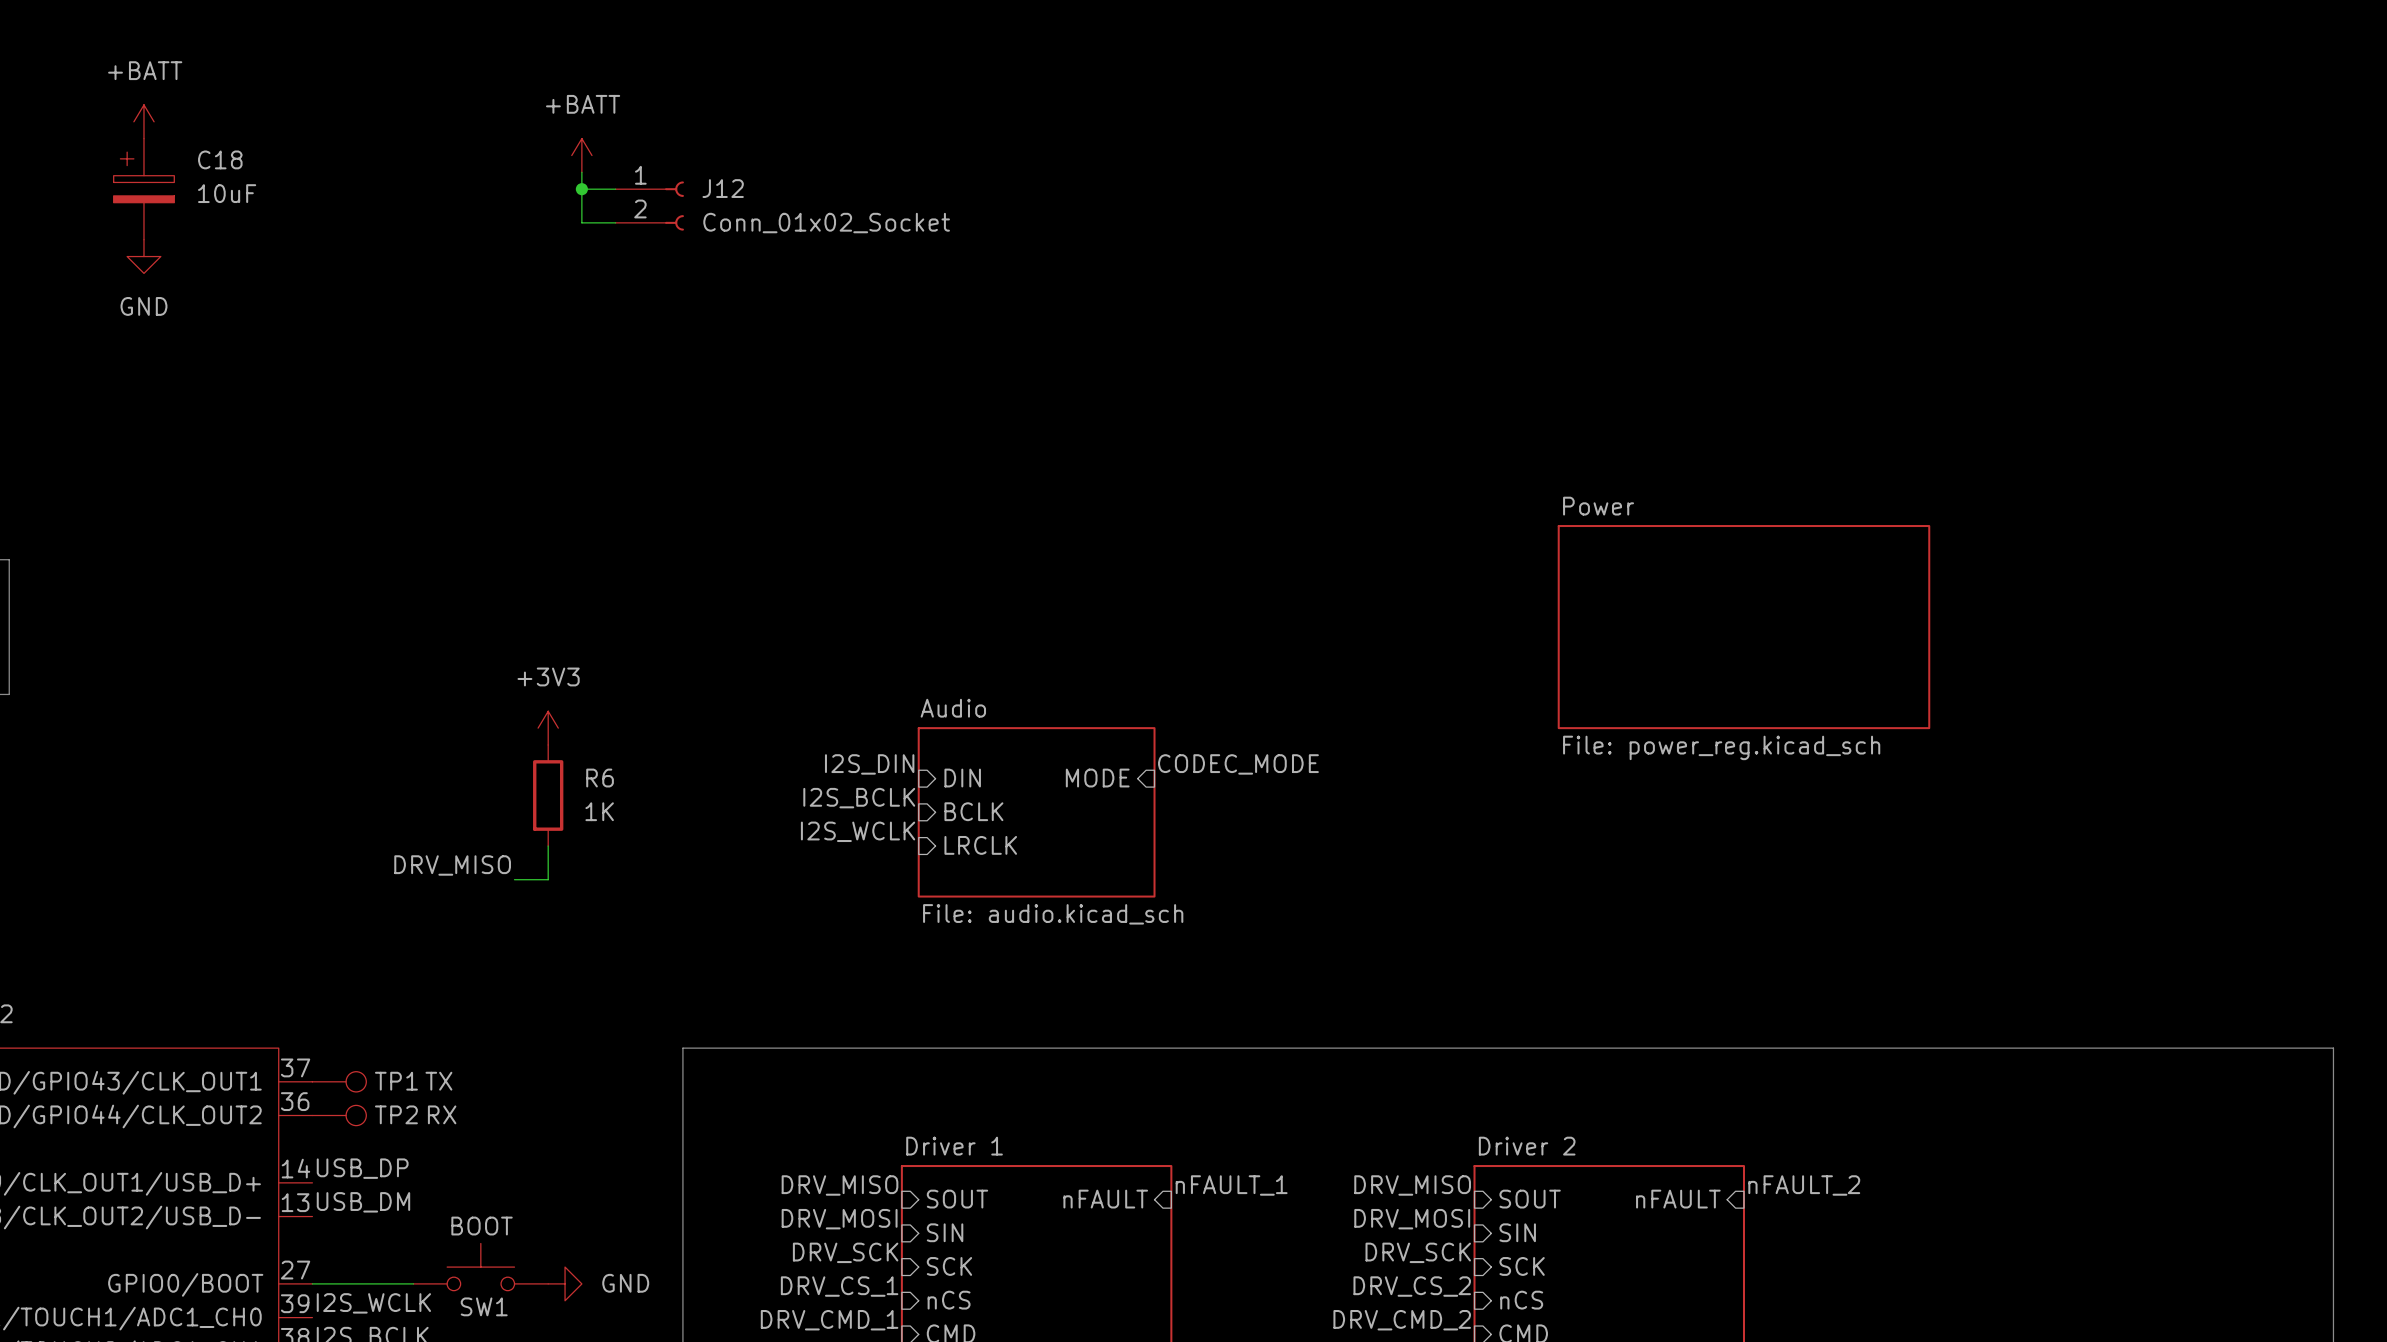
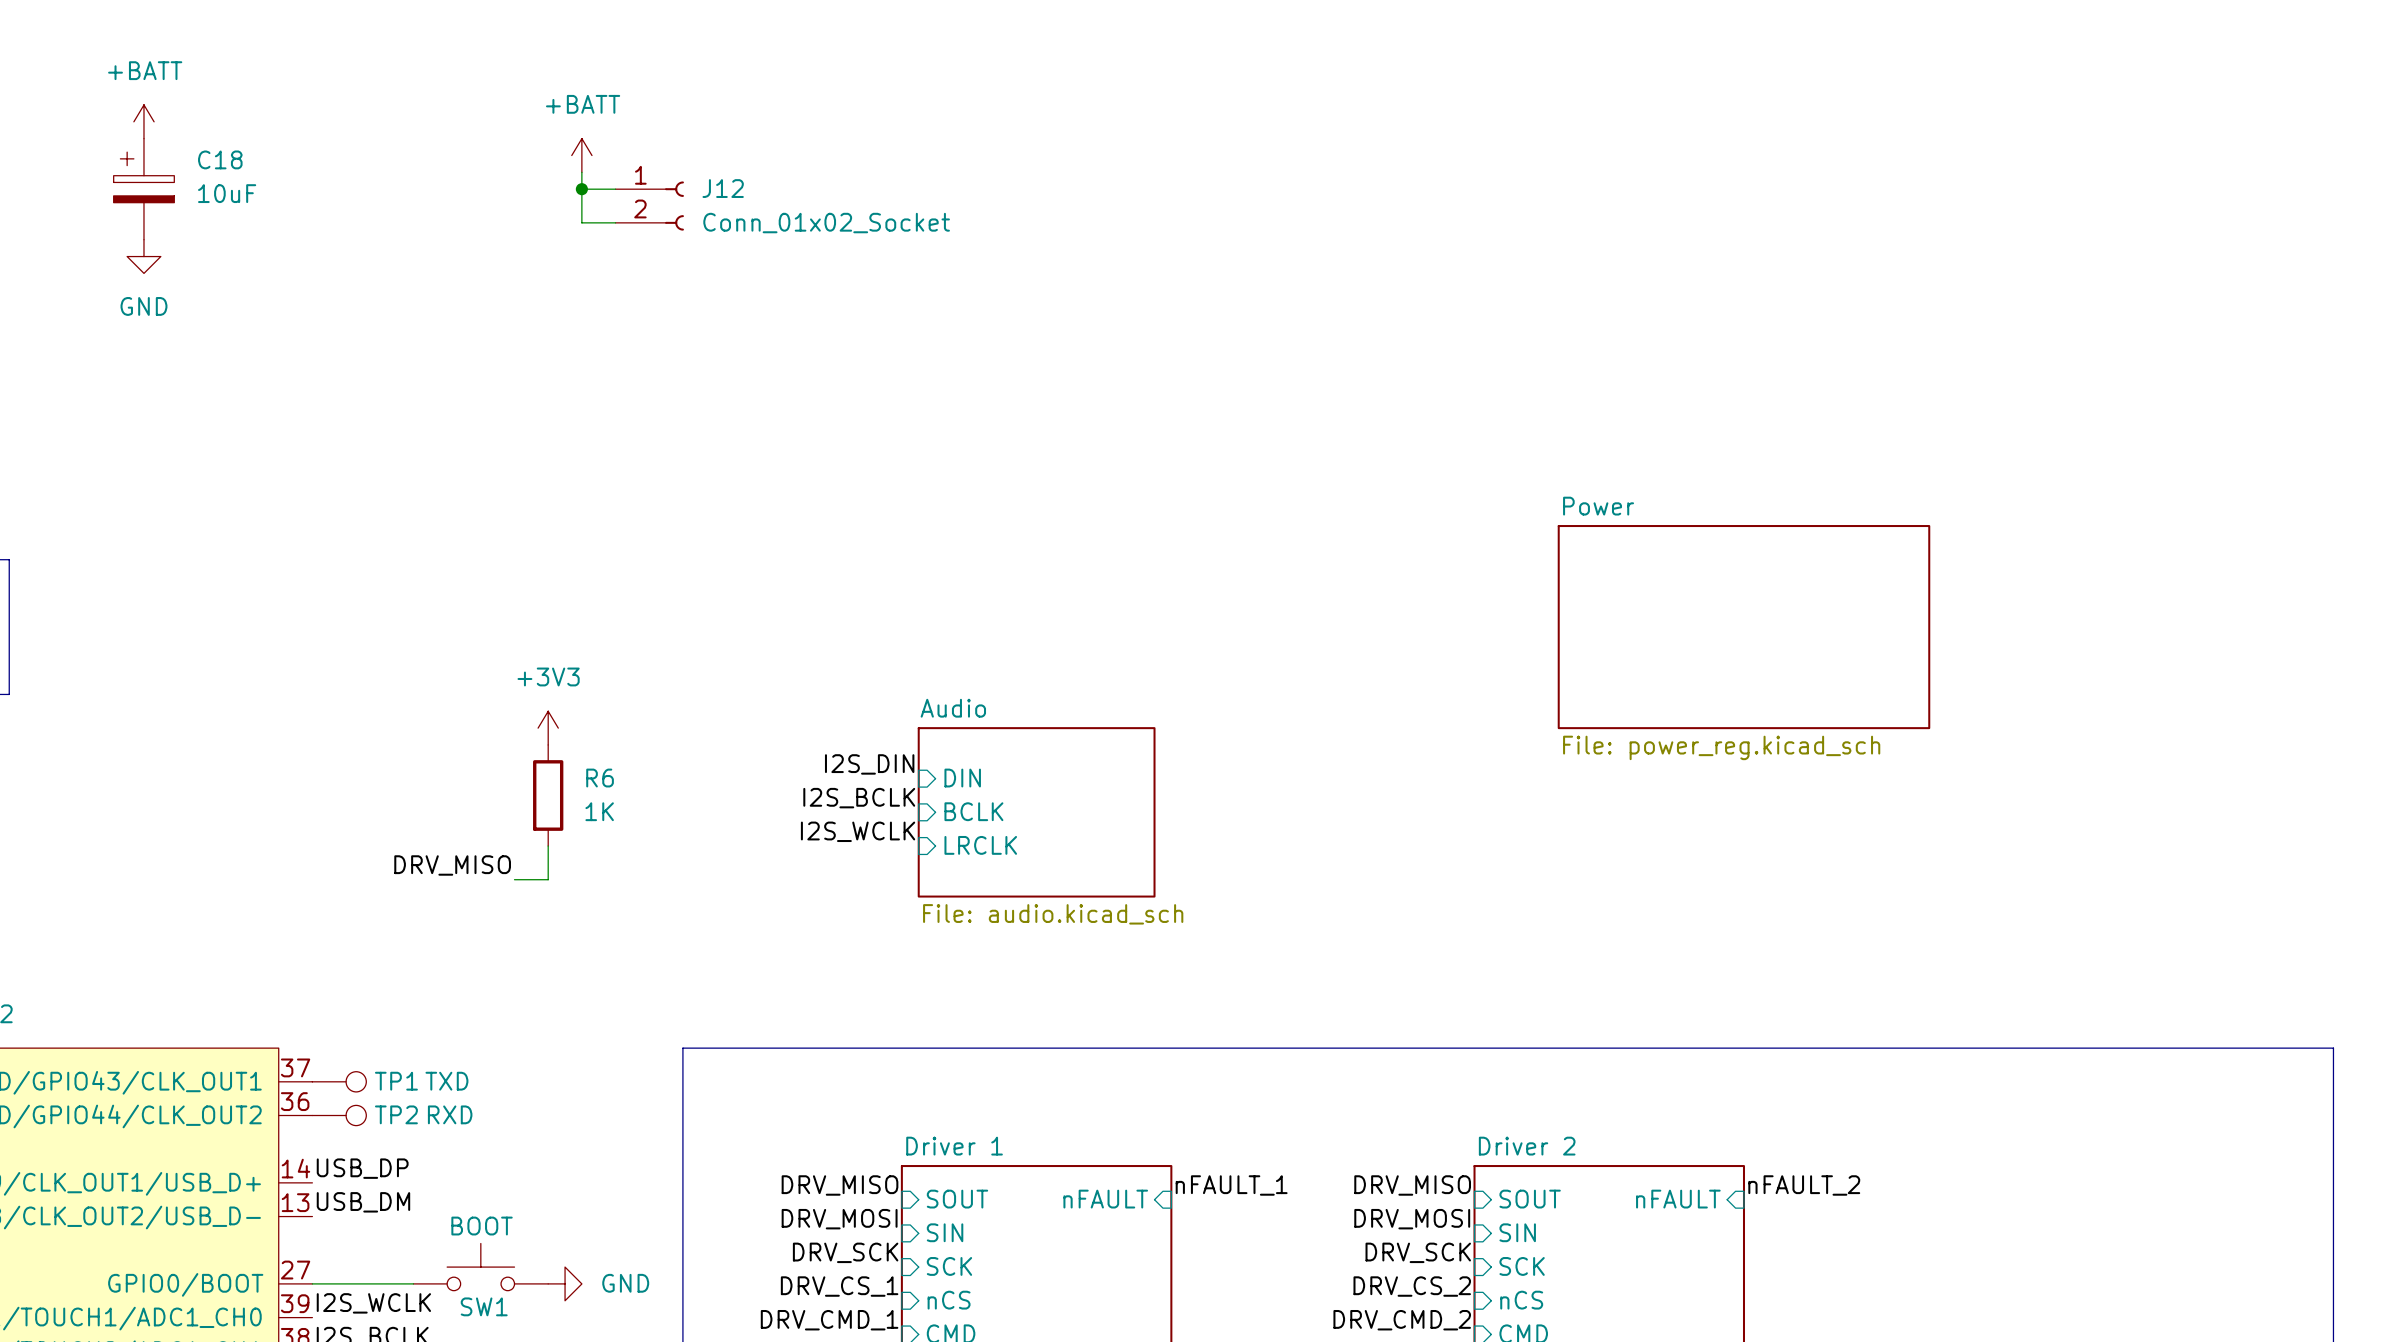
label: CODEC_MODE (1238, 764) -> none
sheet pin: MODE (1097, 778) -> none
TP1 value: TX (438, 1081) -> TXD (446, 1081)
TP2 value: RX (442, 1114) -> RXD (450, 1114)

